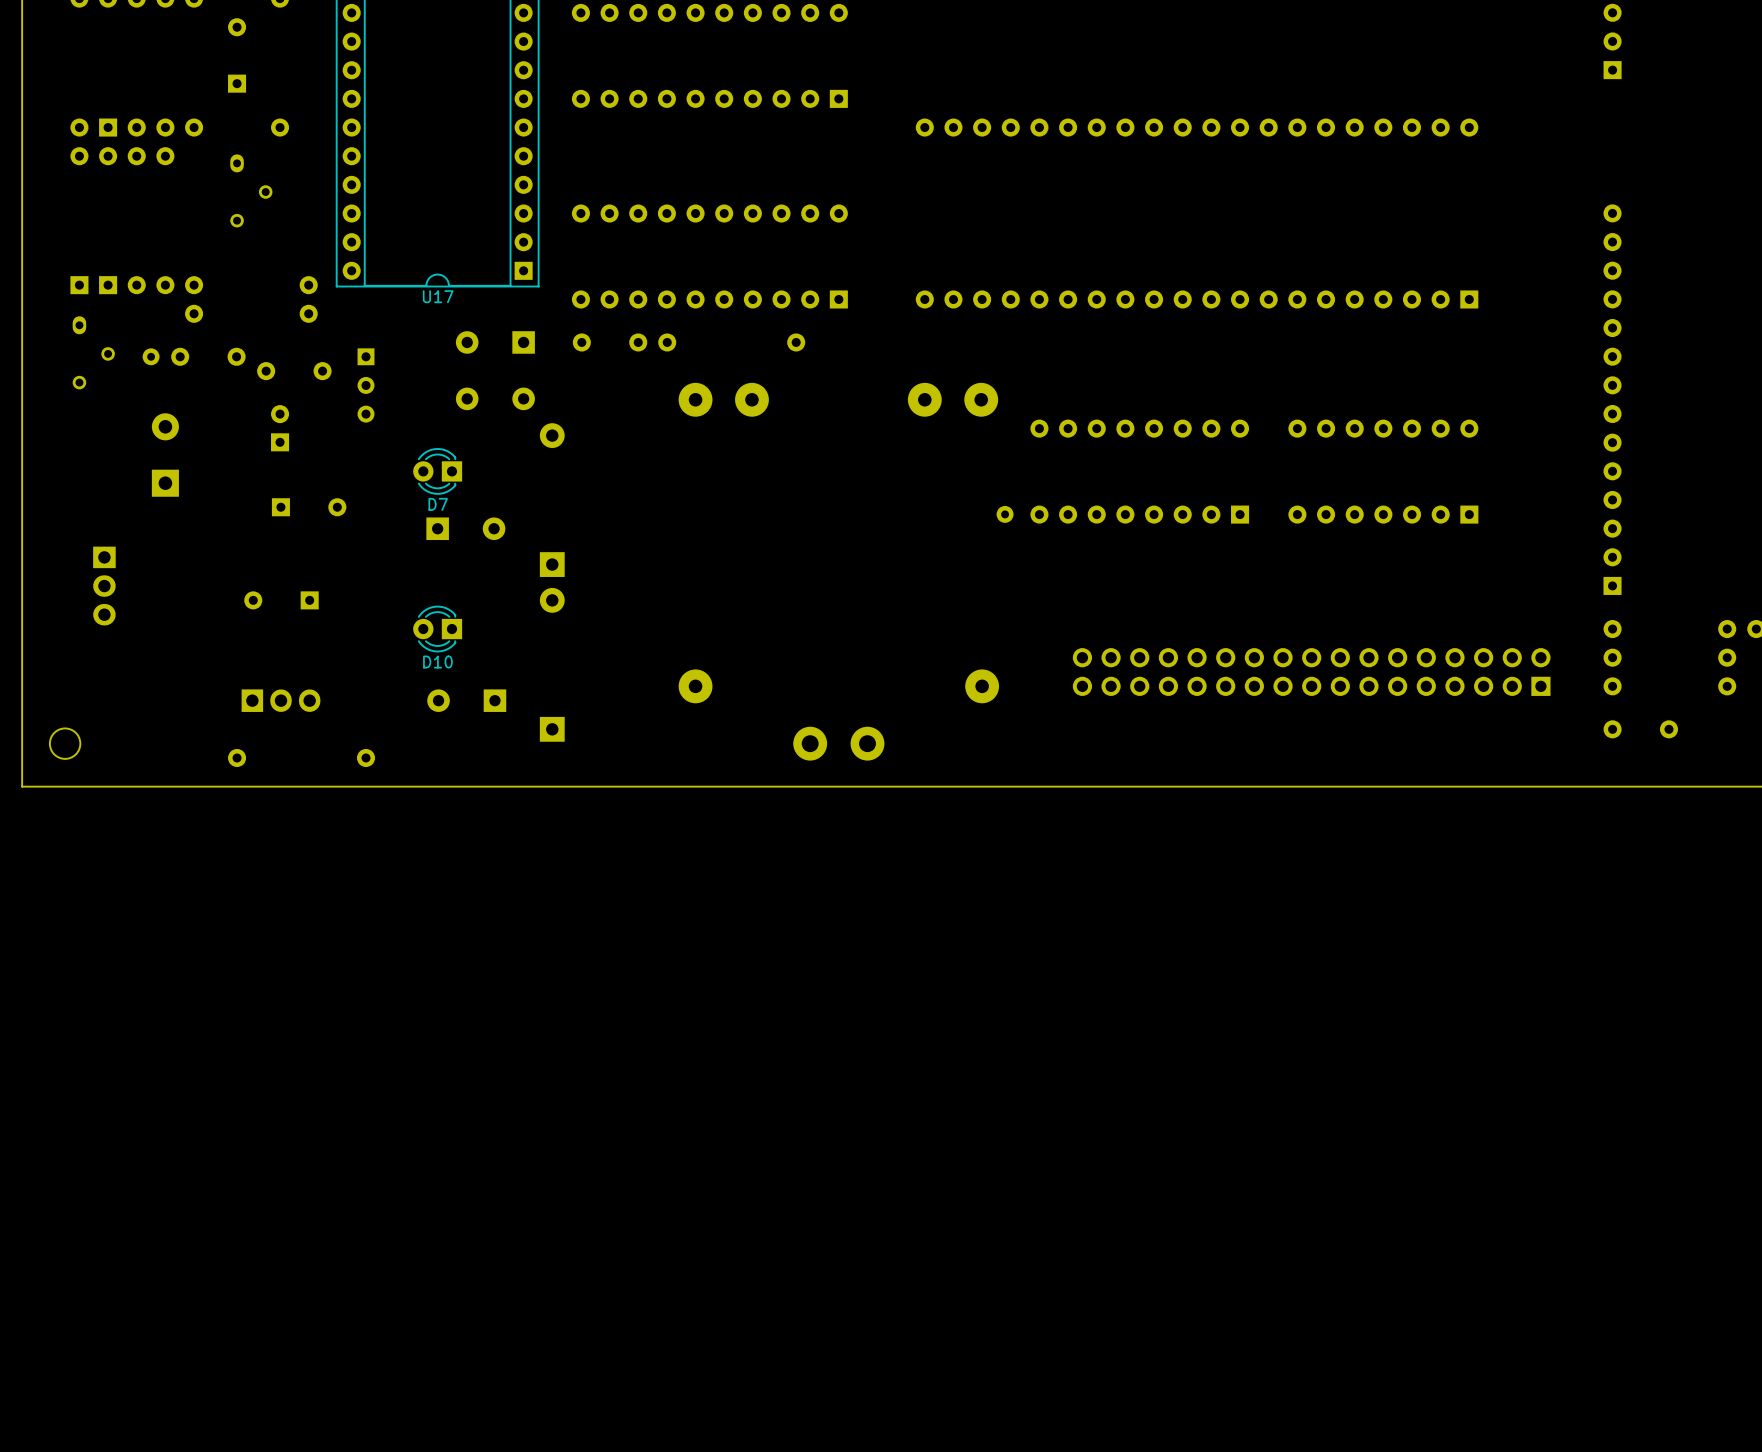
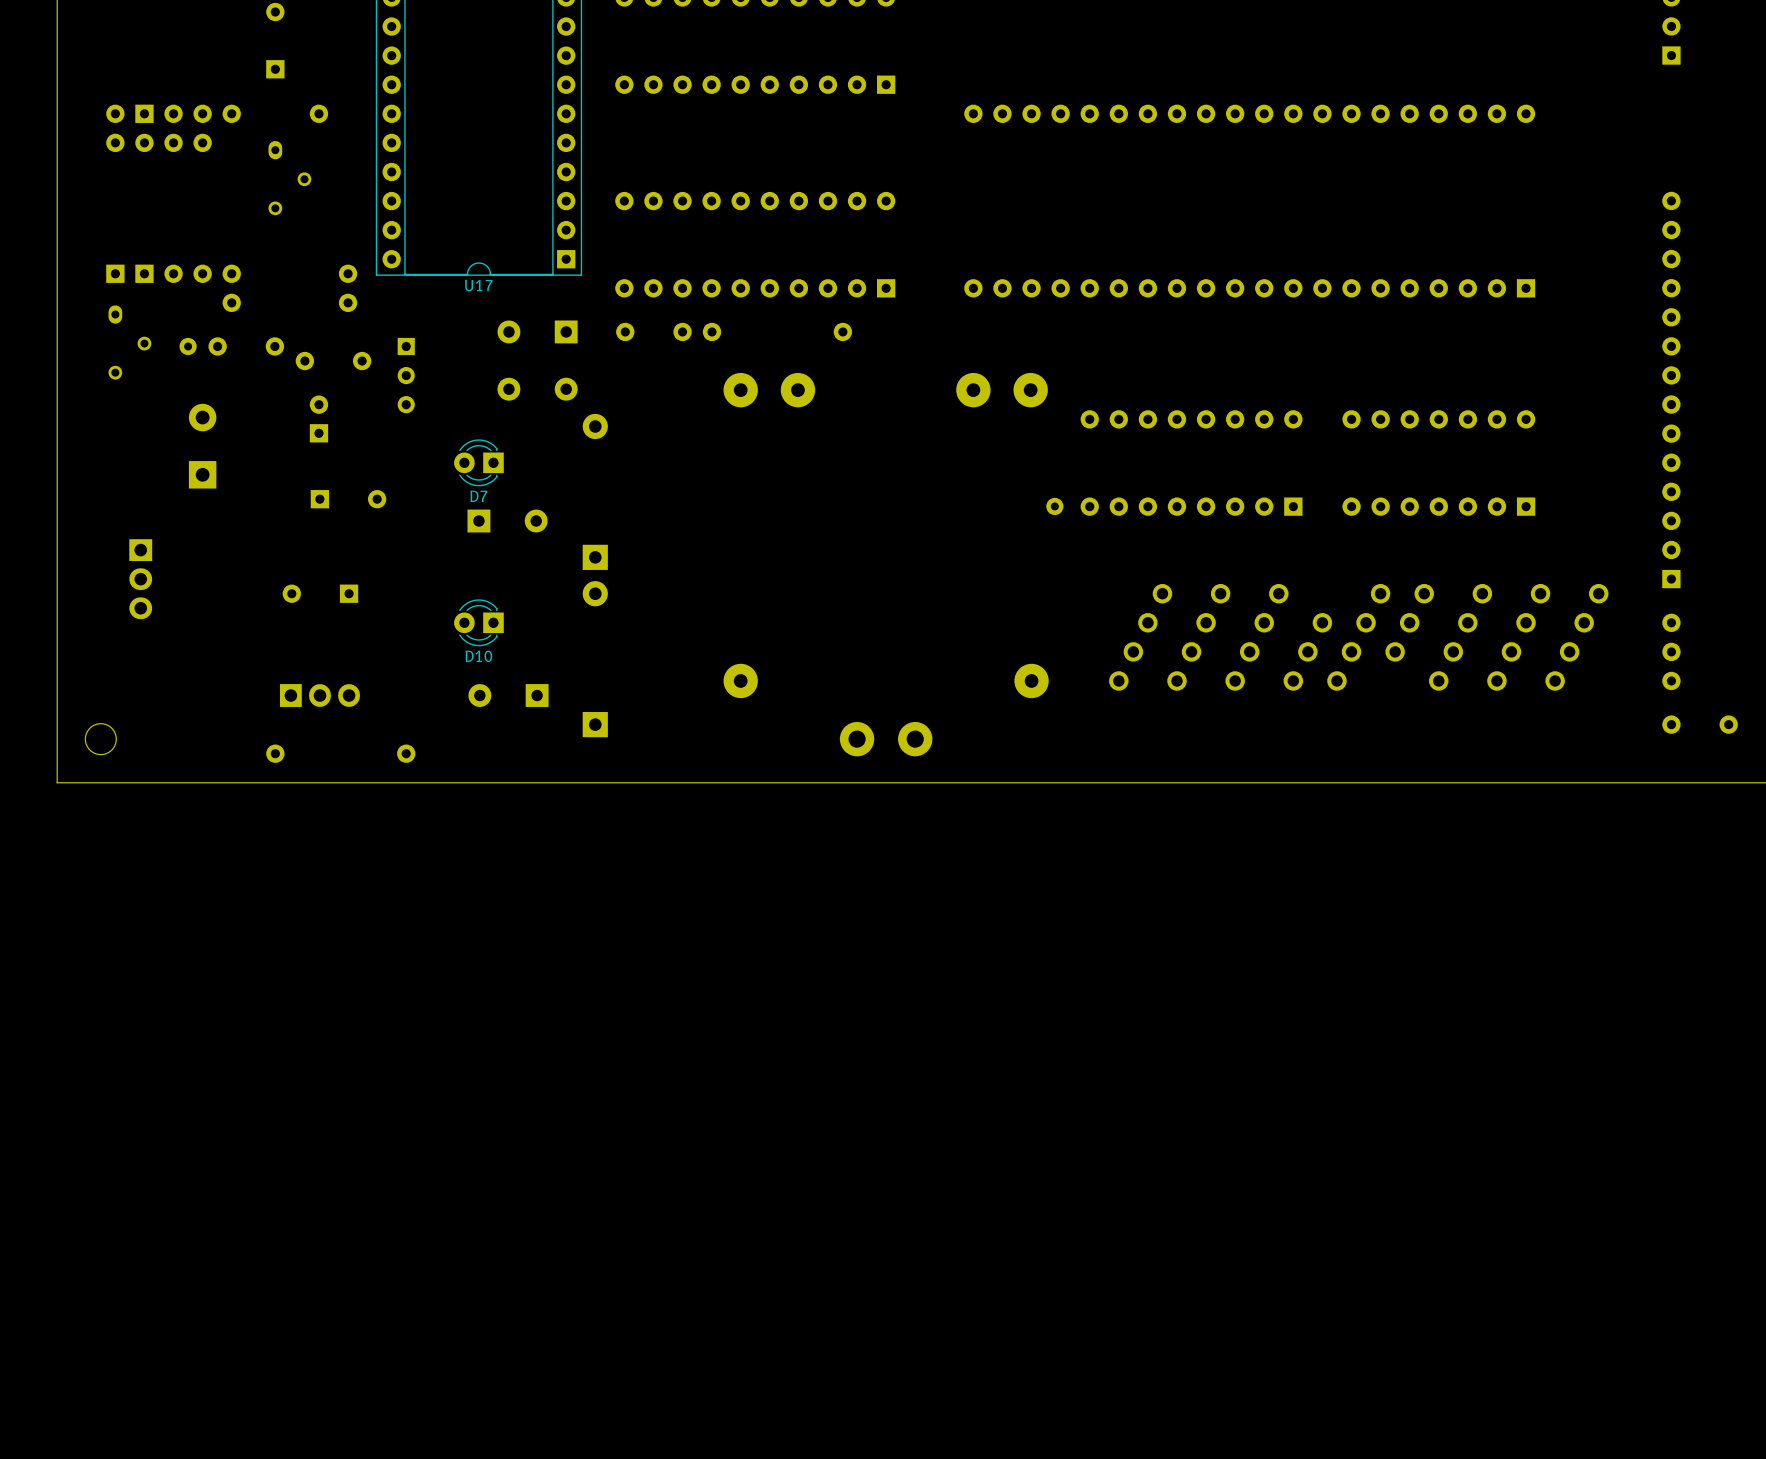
part: none -> (1358, 637)
part: (1311, 672) -> none

